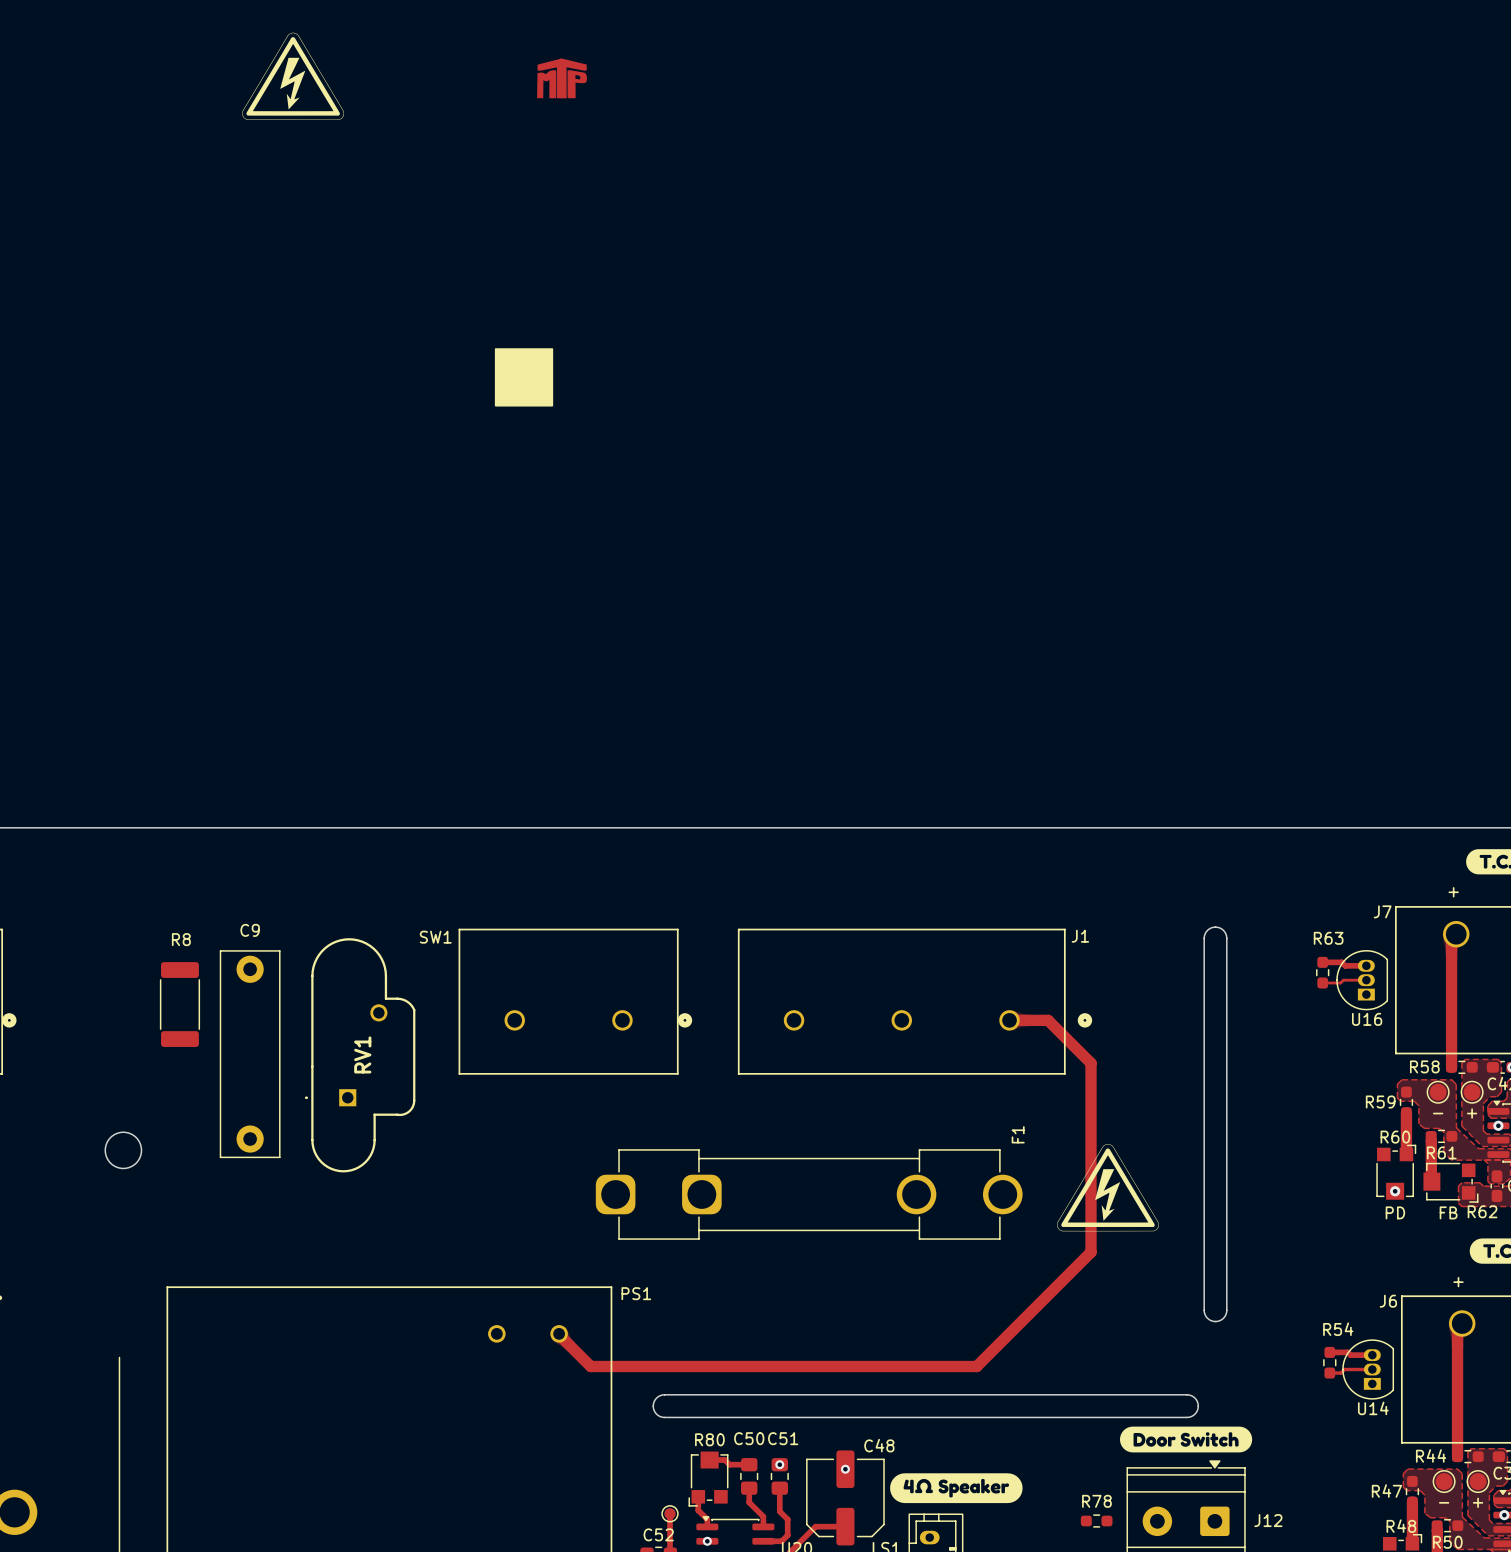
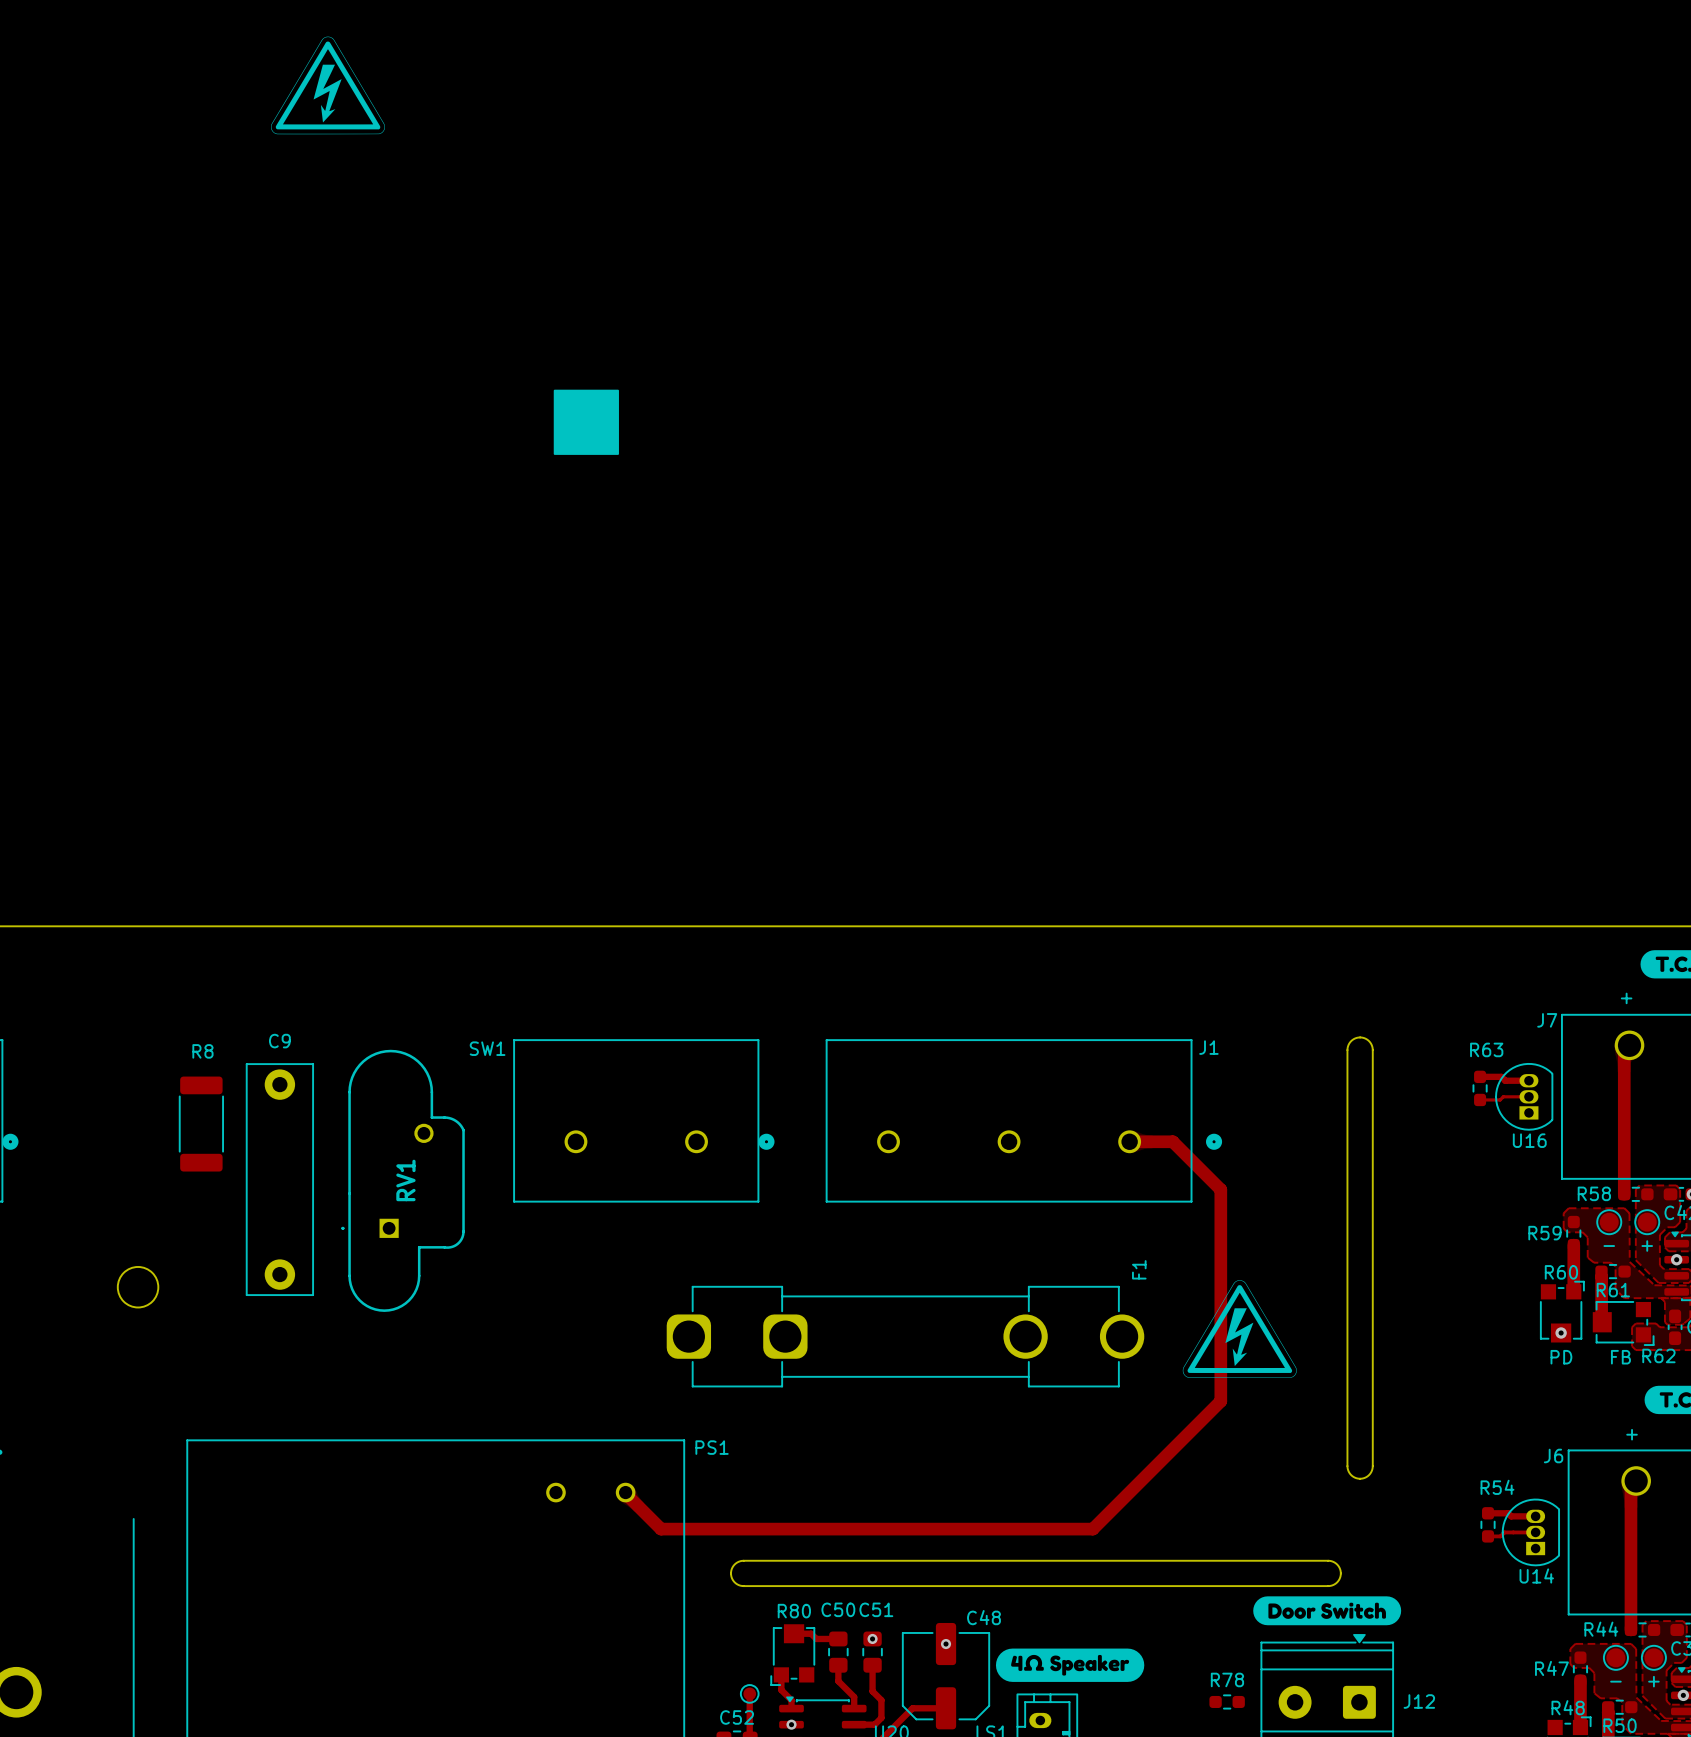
drawing: [537, 58, 587, 99] -> none

